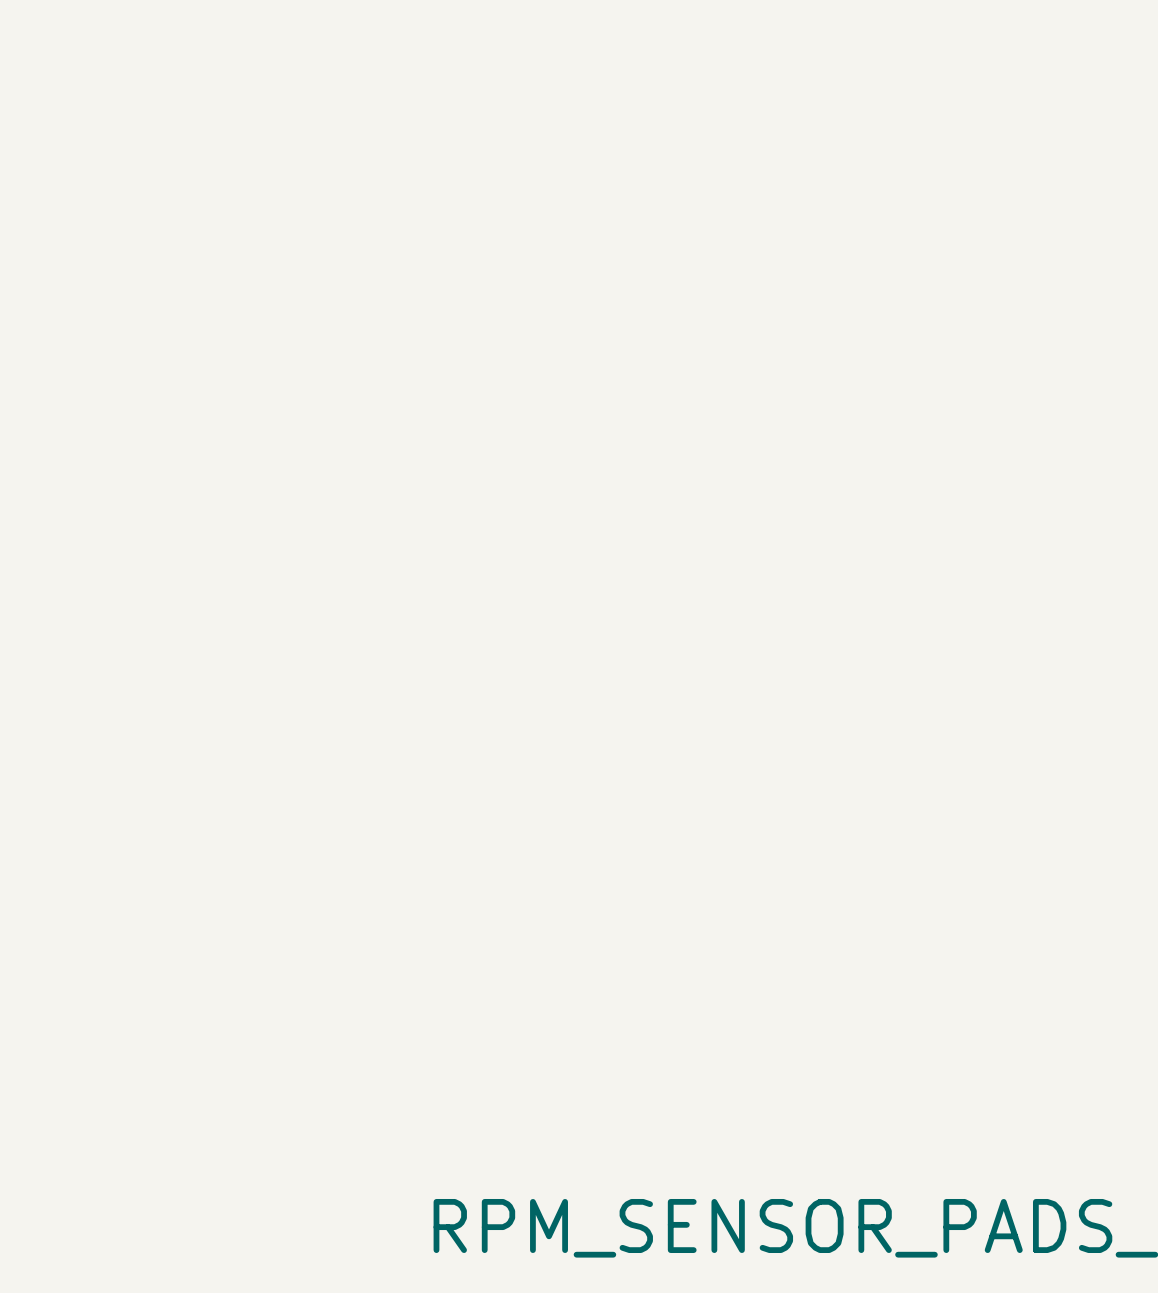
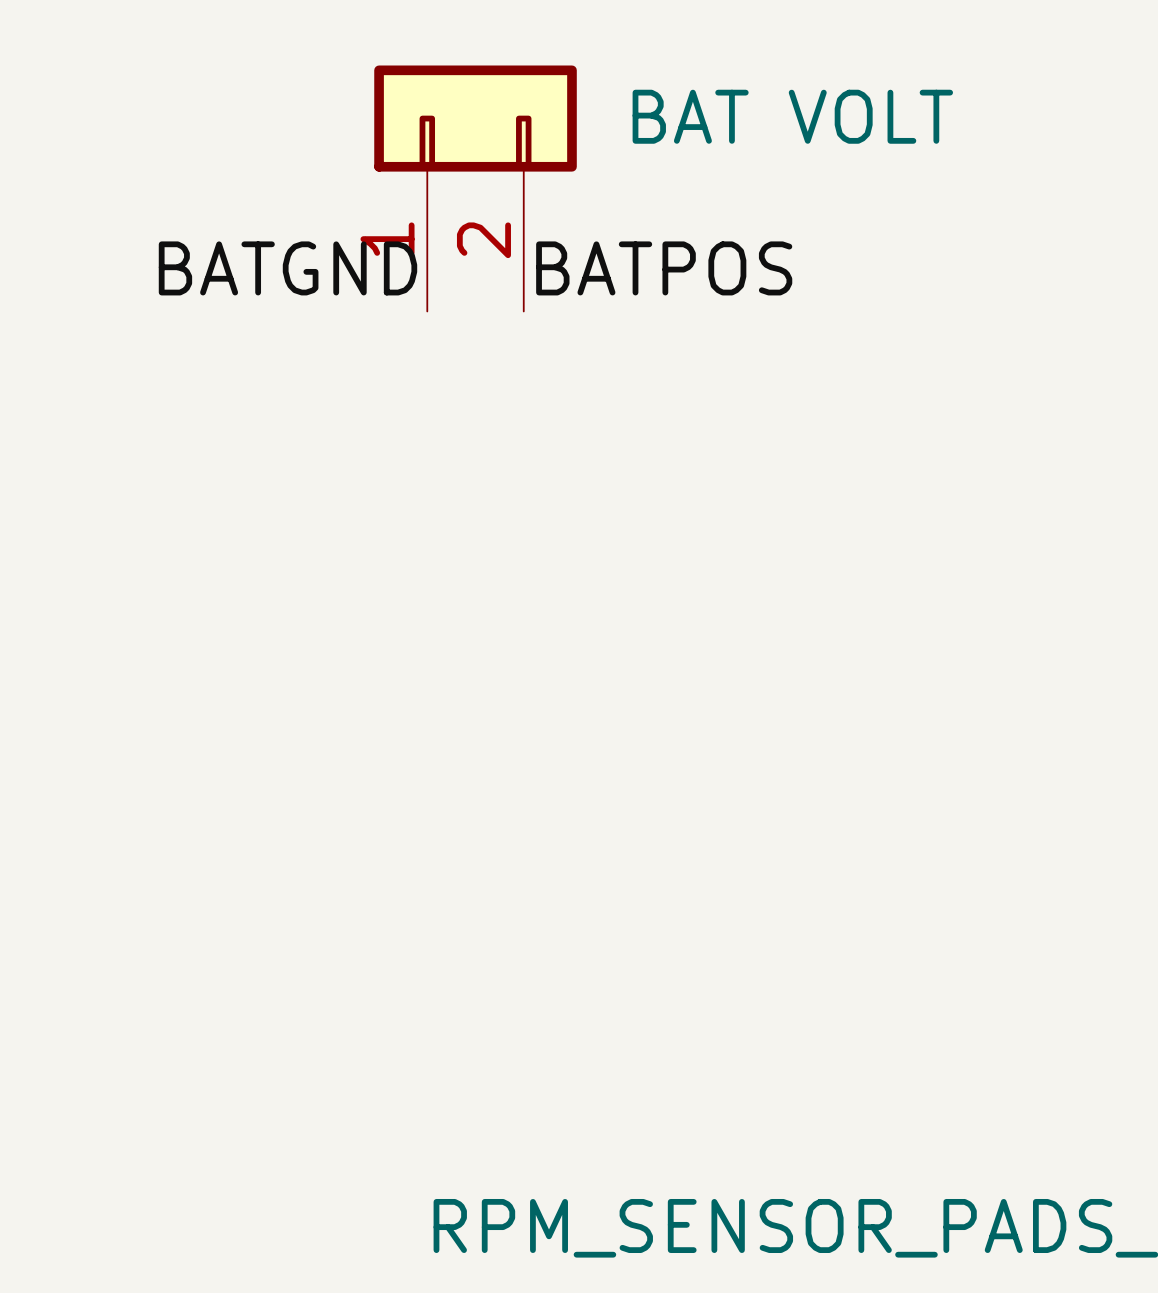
part: none -> BAT VOLT (475, 188)
label: none -> BATGND (287, 268)
label: none -> BATPOS (664, 268)

